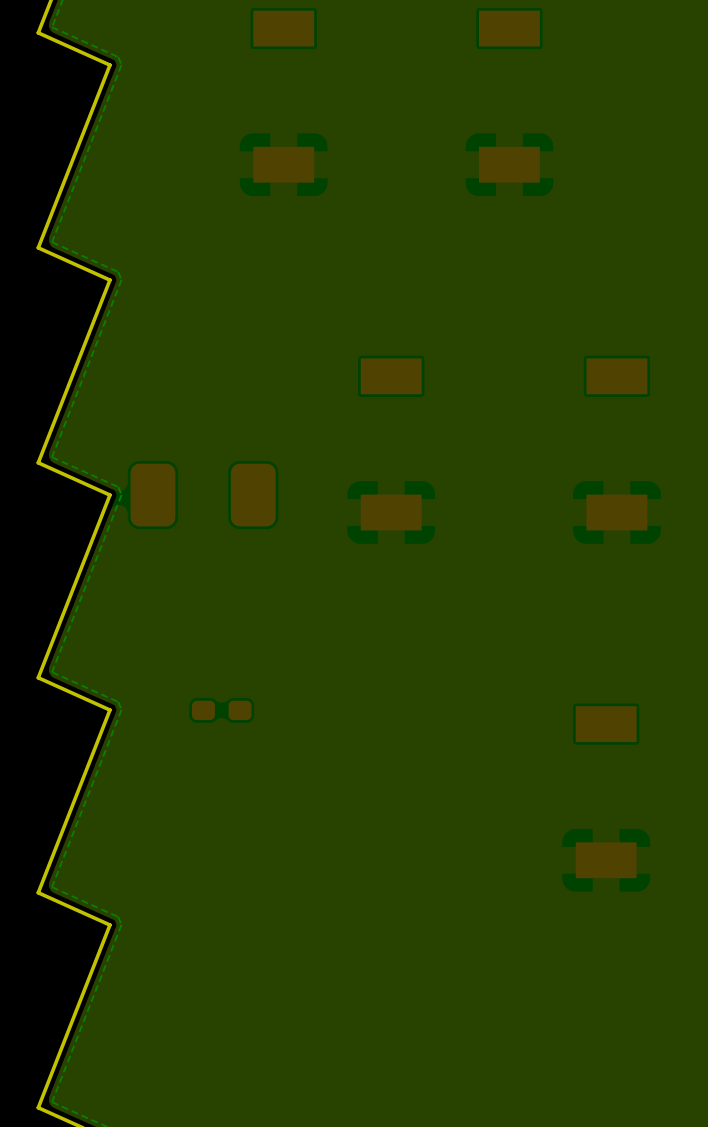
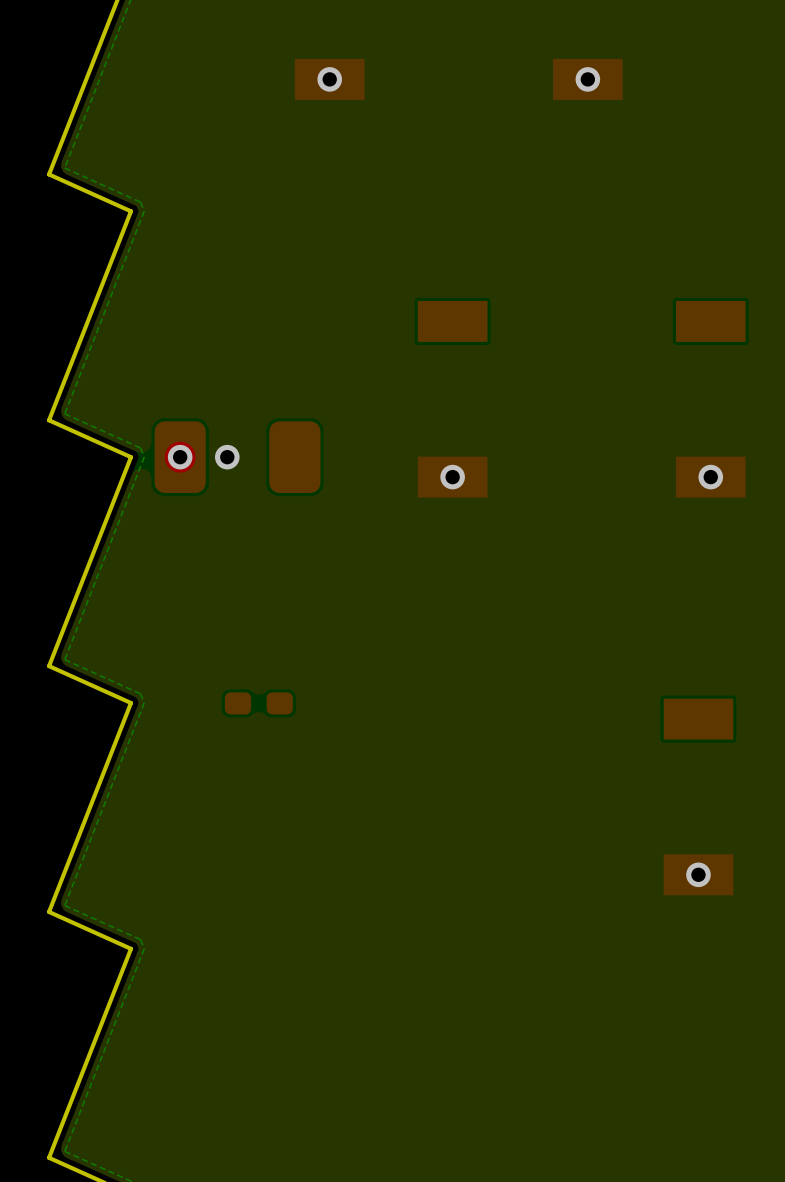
via: none -> (329, 79)
via: none -> (587, 79)
via: none -> (180, 457)
via: none -> (227, 457)
via: none -> (452, 477)
via: none -> (710, 477)
via: none -> (698, 874)

